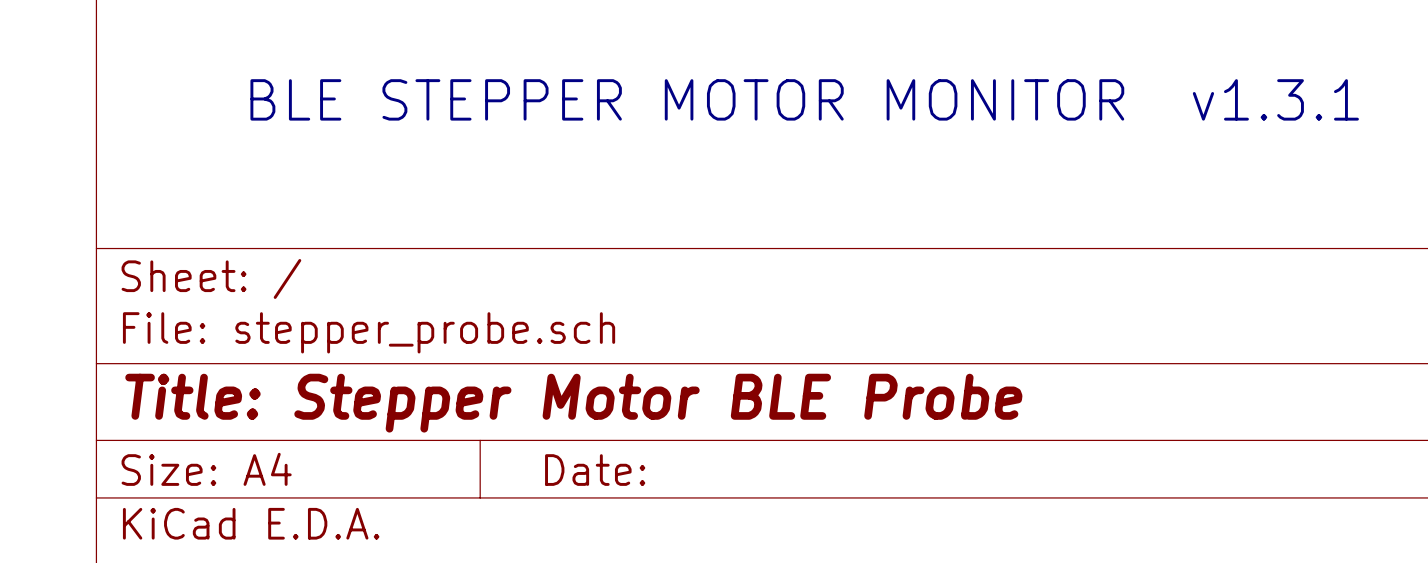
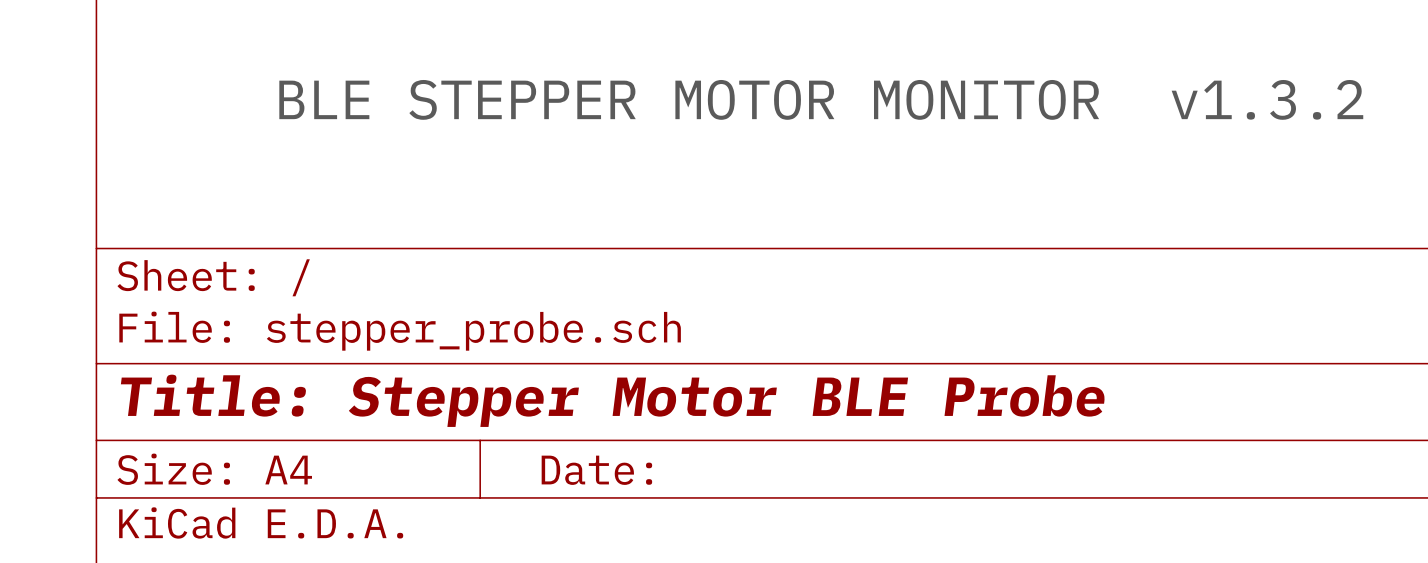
text: BLE STEPPER MOTOR MONITOR v1.3.1 (804, 99) -> BLE STEPPER MOTOR MONITOR v1.3.2 (821, 99)

